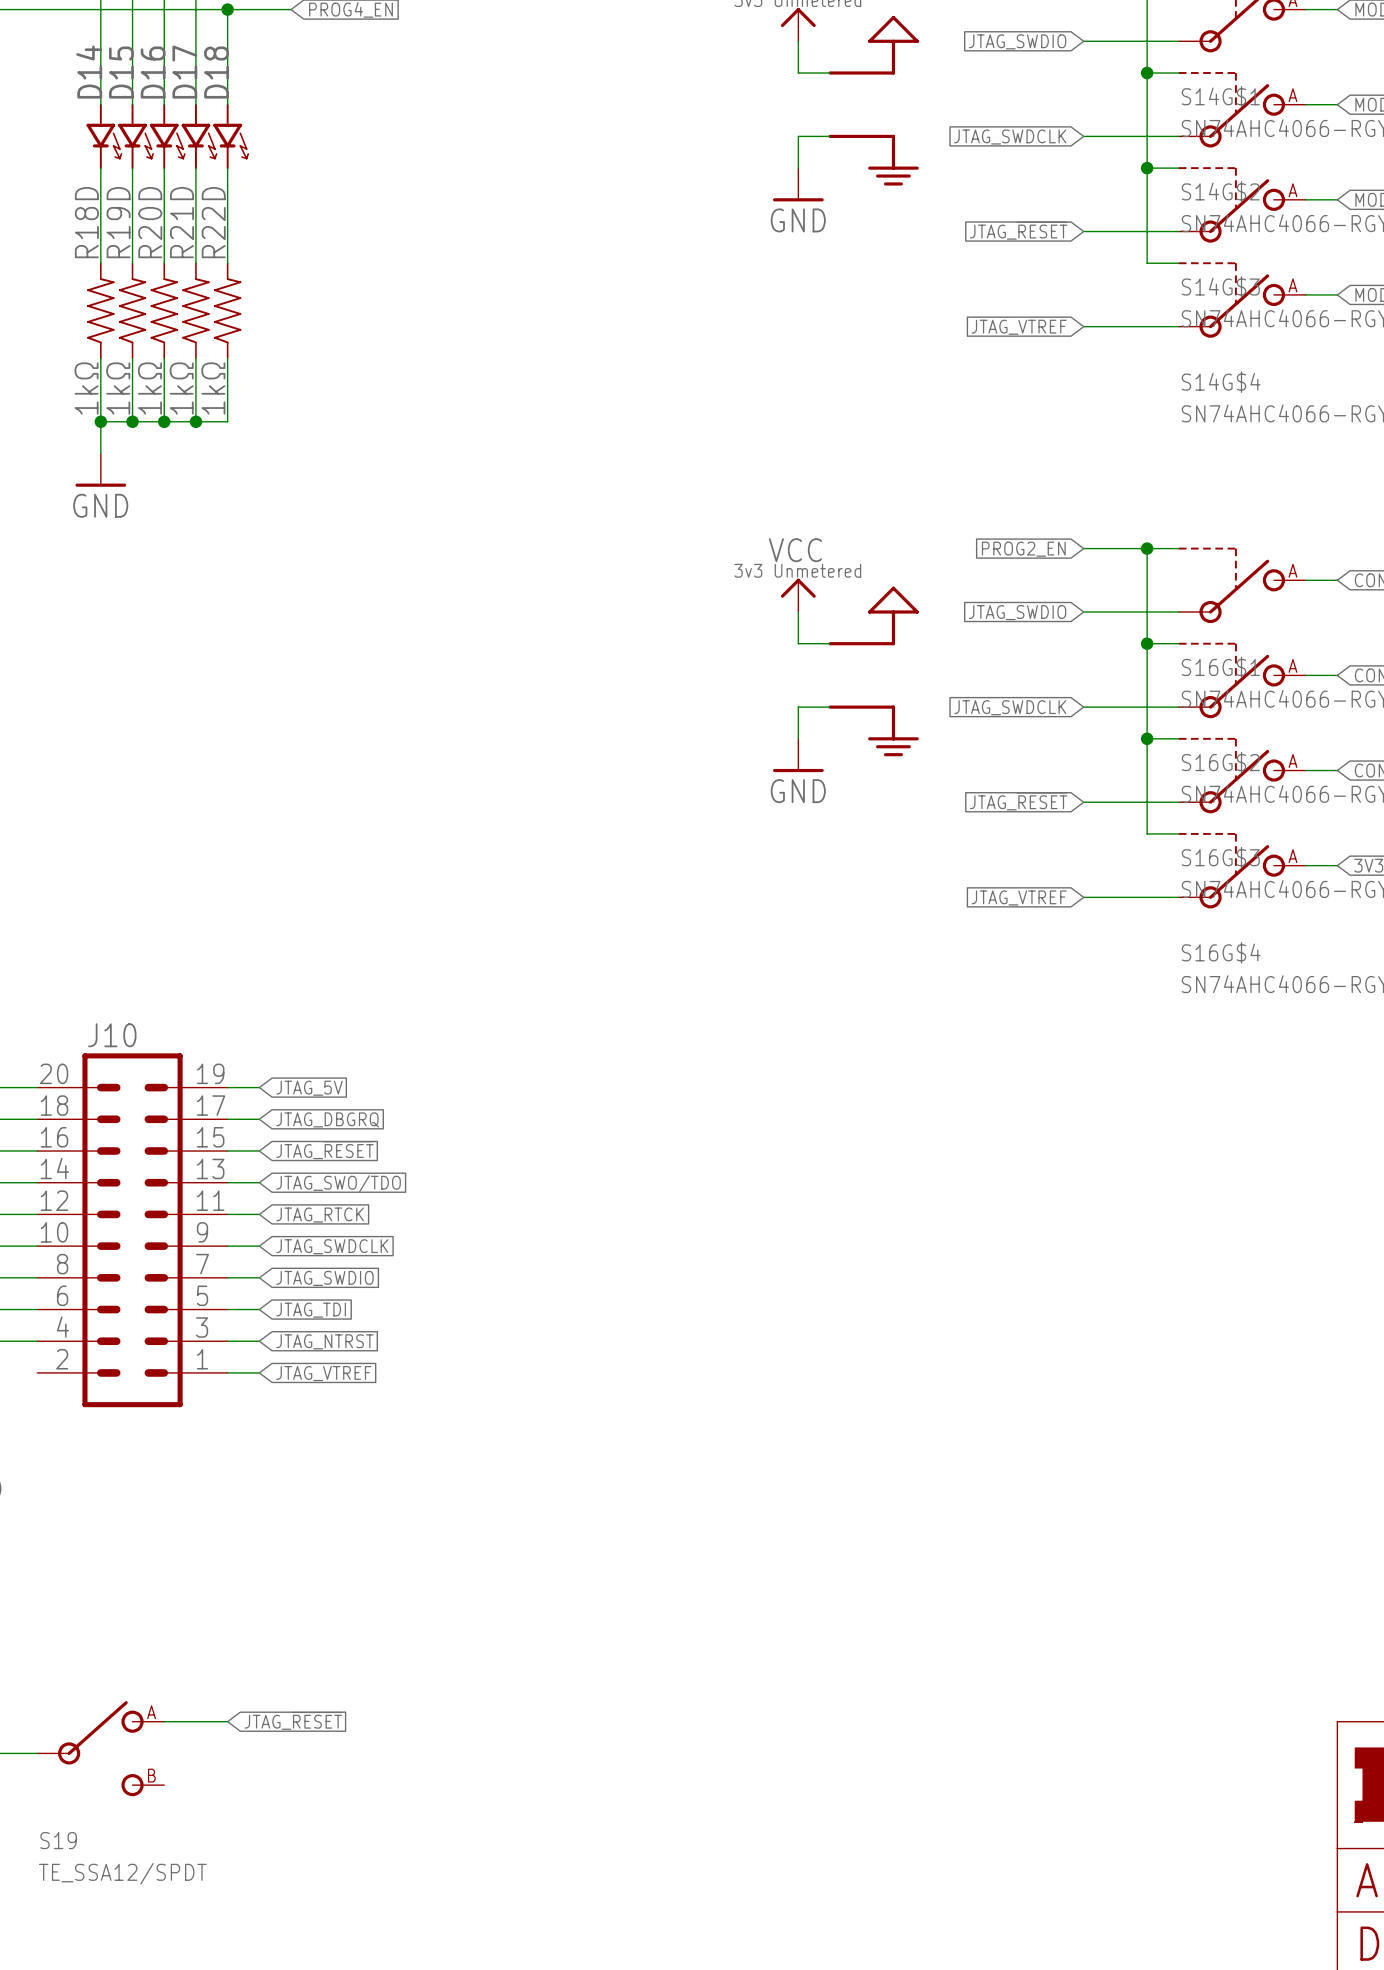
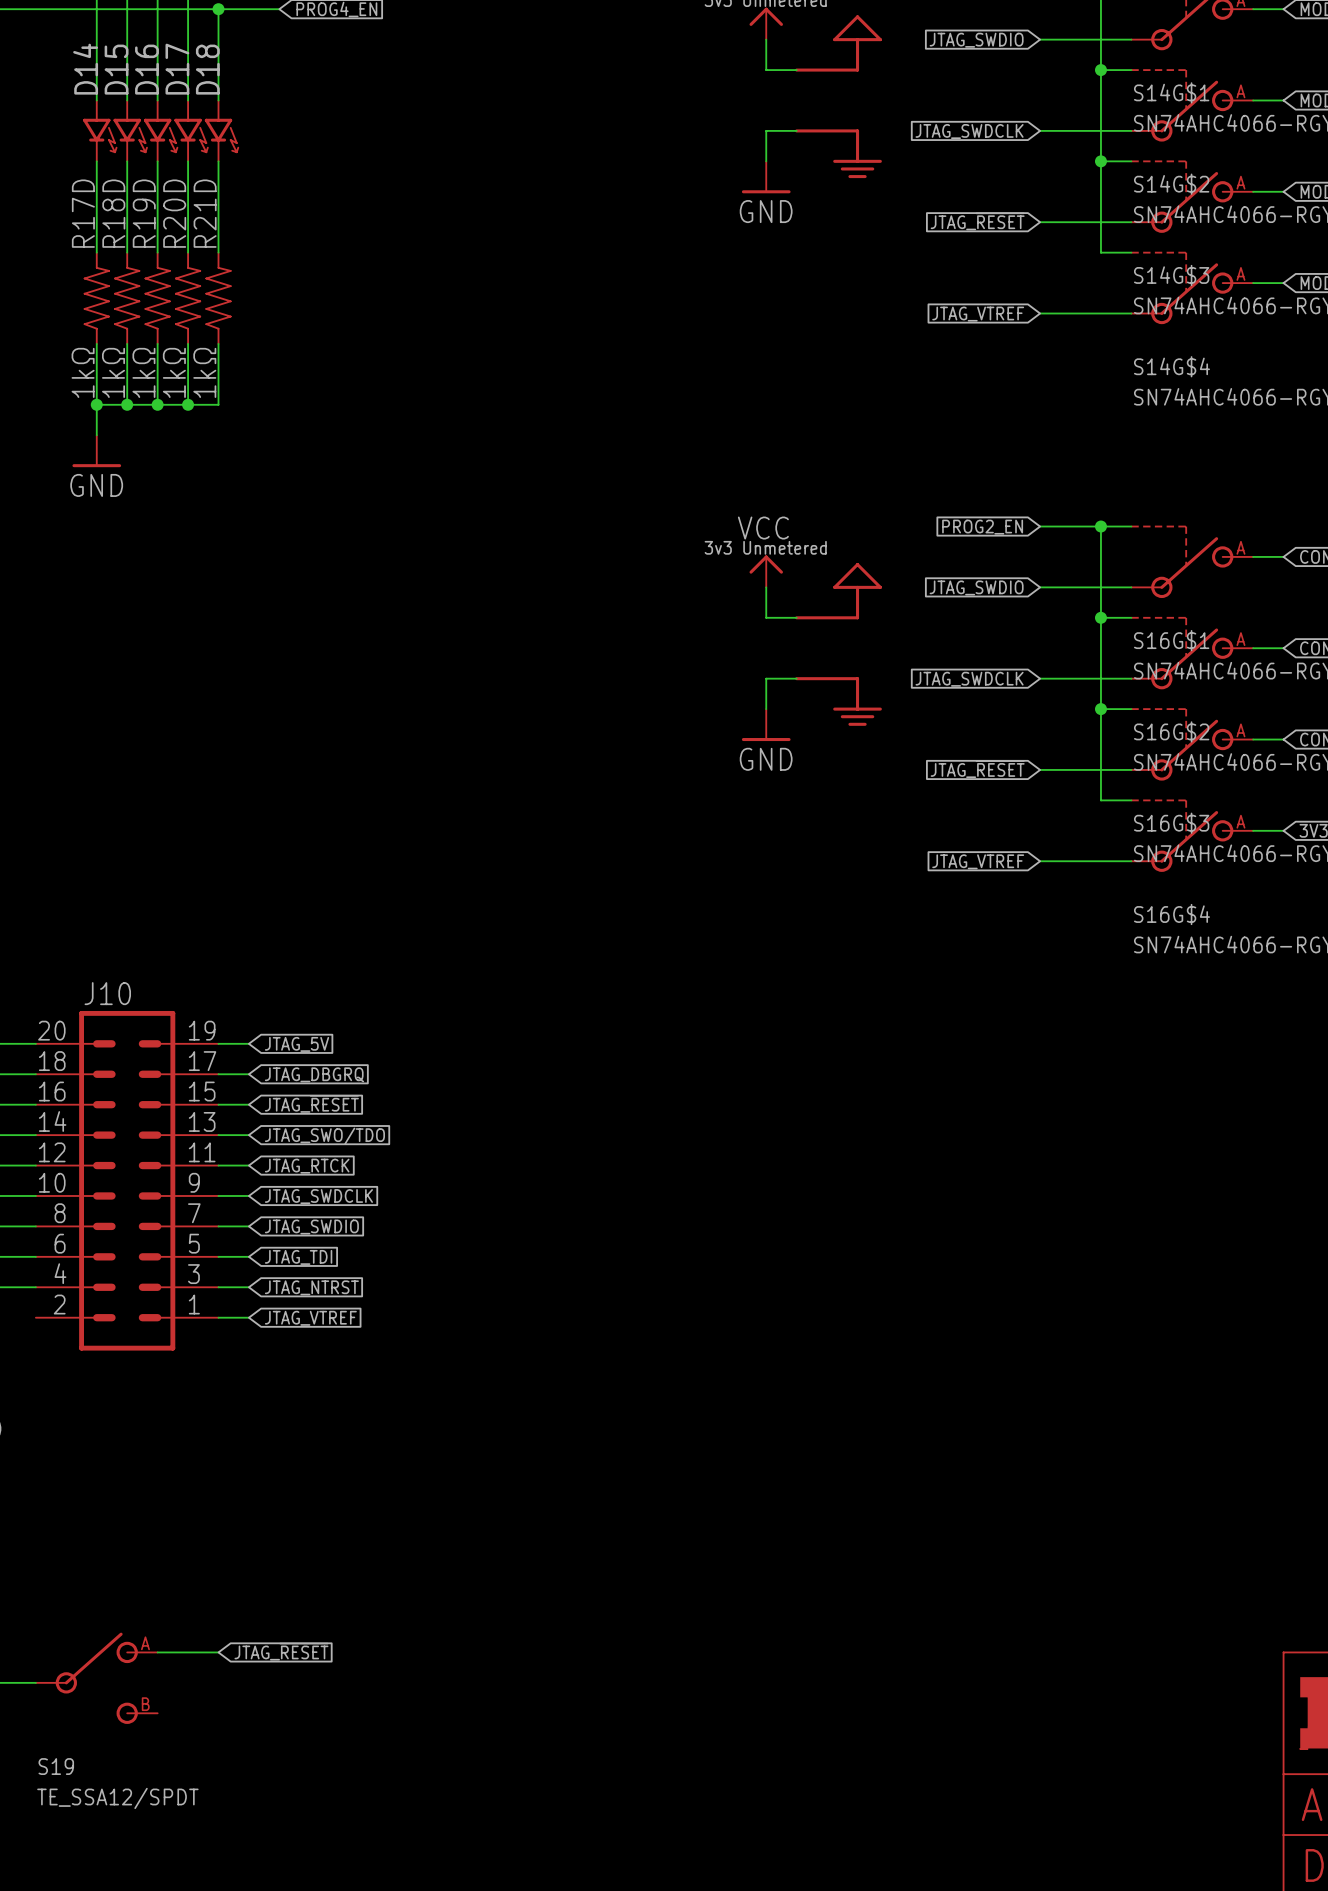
R18D name: R18D (86, 222) -> R17D (83, 213)
R19D name: R19D (118, 222) -> R18D (113, 213)
R20D name: R20D (150, 222) -> R19D (144, 213)
R21D name: R21D (182, 222) -> R20D (174, 213)
R22D name: R22D (213, 222) -> R21D (205, 213)

